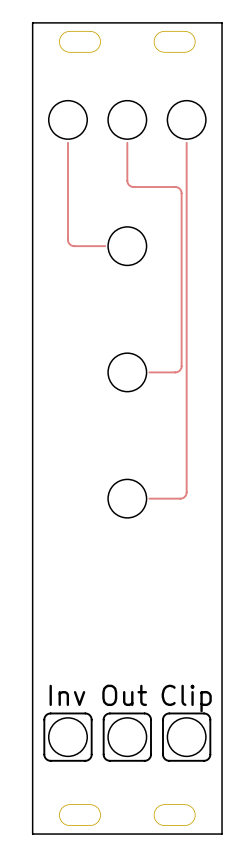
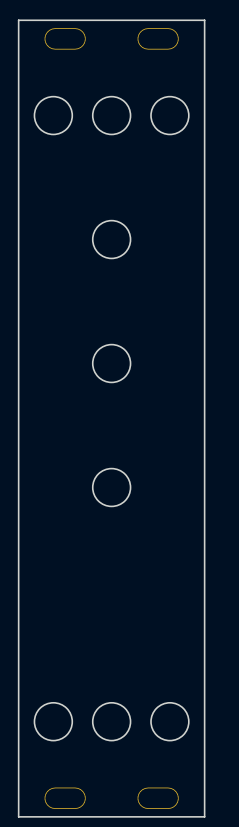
top track: (67, 142) (68, 241) (73, 246) (105, 246) -> none
top track: (127, 142) (127, 180) (129, 185) (133, 187) (176, 187) (181, 192) (181, 367) (176, 372) (149, 372) -> none
top track: (186, 142) (186, 493) (181, 498) (149, 498) -> none
text: Inv (67, 695) -> none
text: Out (124, 695) -> none
text: Clip (186, 698) -> none
line: (50, 713) (86, 713) (90, 715) (91, 754) (89, 759) (50, 760) (45, 758) (44, 719) (46, 715) (50, 713) -> none
line: (109, 713) (145, 713) (149, 715) (150, 754) (148, 759) (109, 760) (105, 758) (103, 719) (105, 715) (109, 713) -> none
line: (169, 713) (204, 713) (208, 715) (210, 754) (207, 759) (169, 760) (164, 758) (163, 719) (164, 715) (169, 713) -> none

